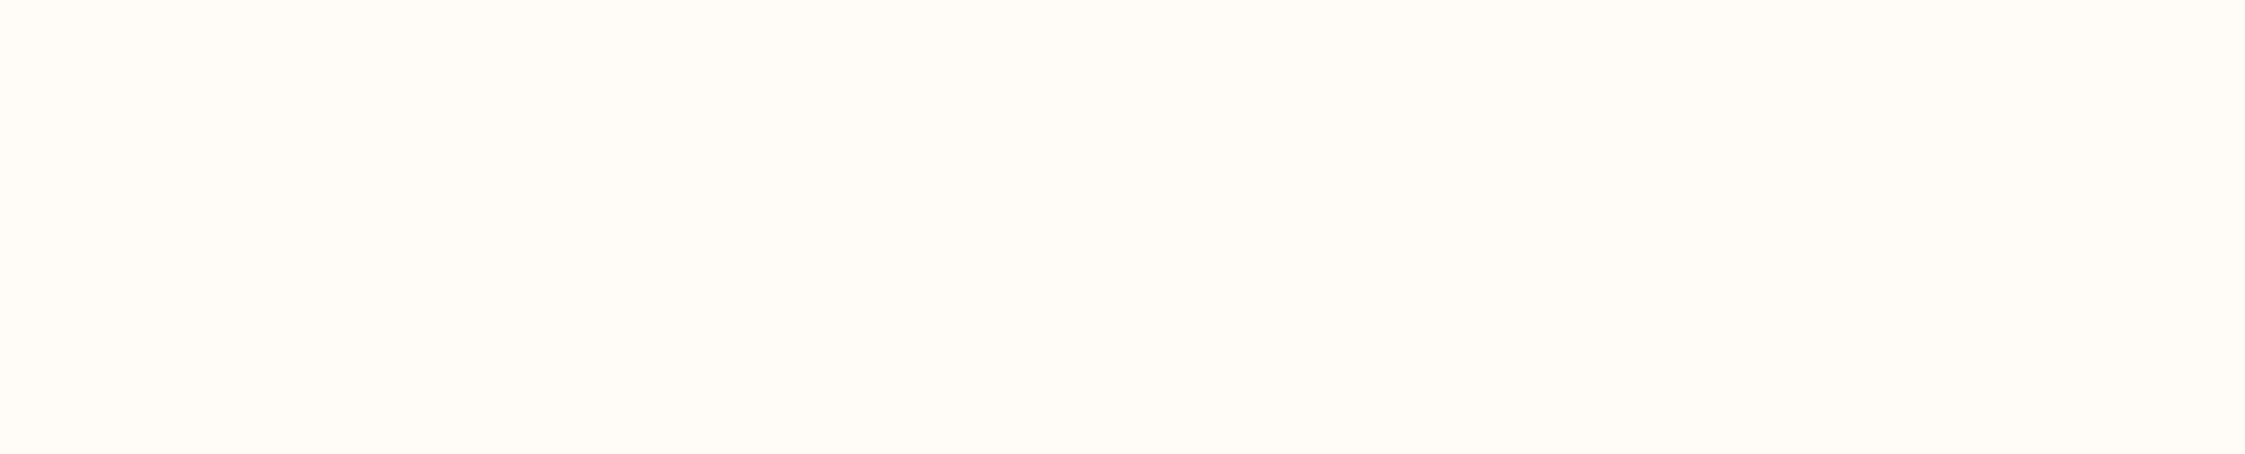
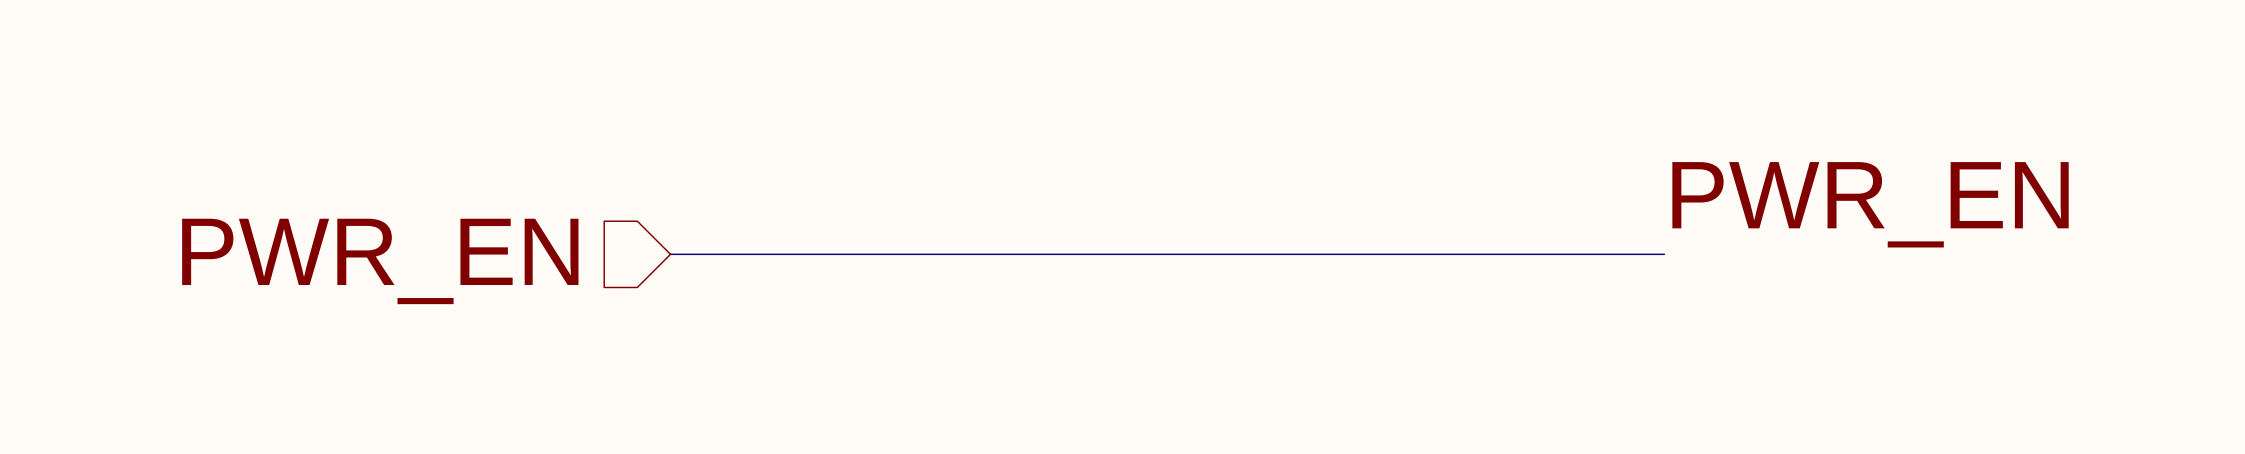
label: none -> PWR_EN (1870, 204)
wire: none -> (670, 254) (1664, 254)
hierarchical label: none -> PWR_EN (380, 261)

